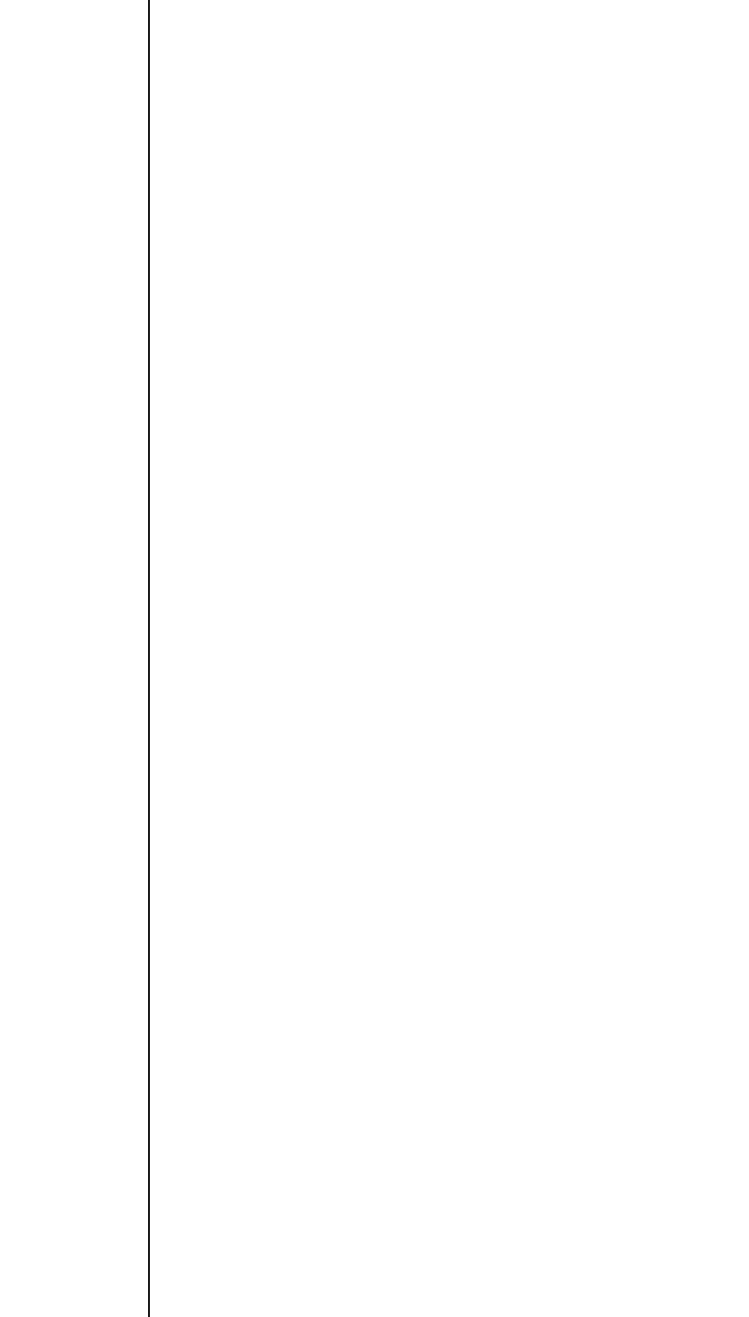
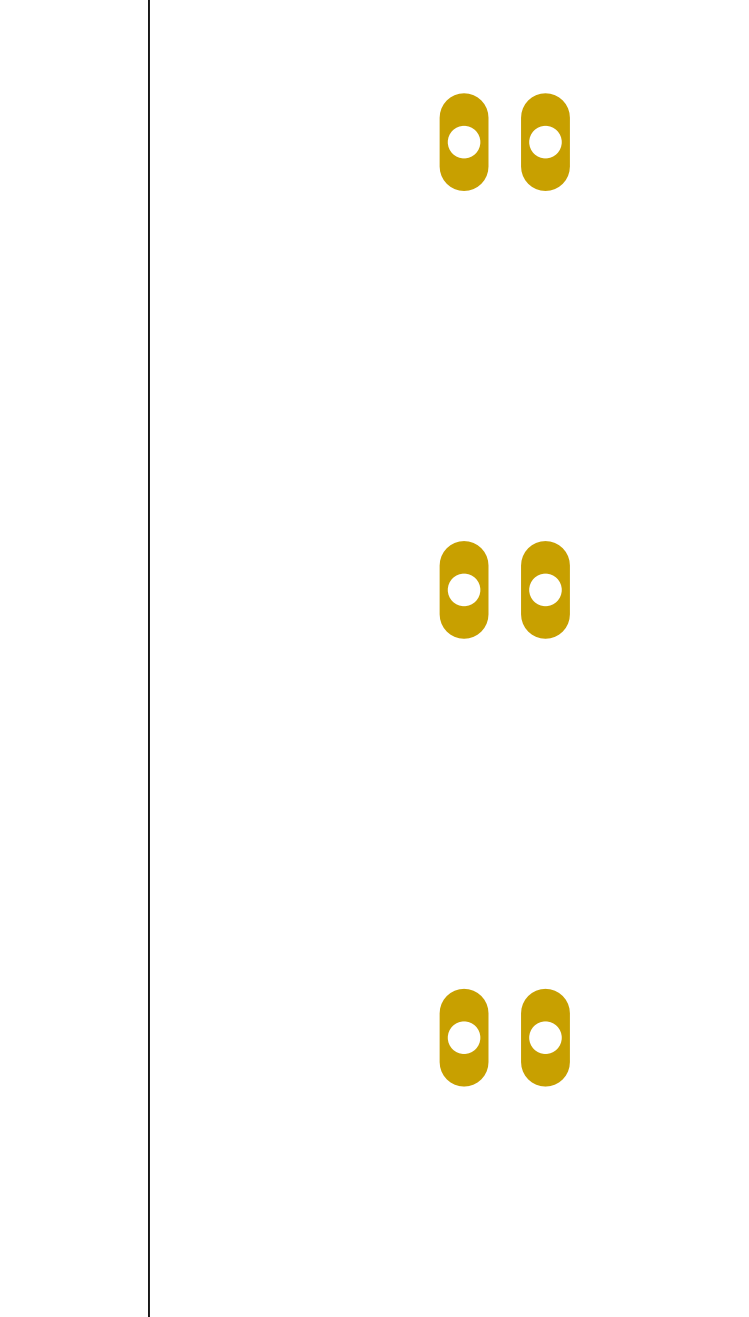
part: none -> (504, 142)
part: none -> (504, 589)
part: none -> (504, 1037)

